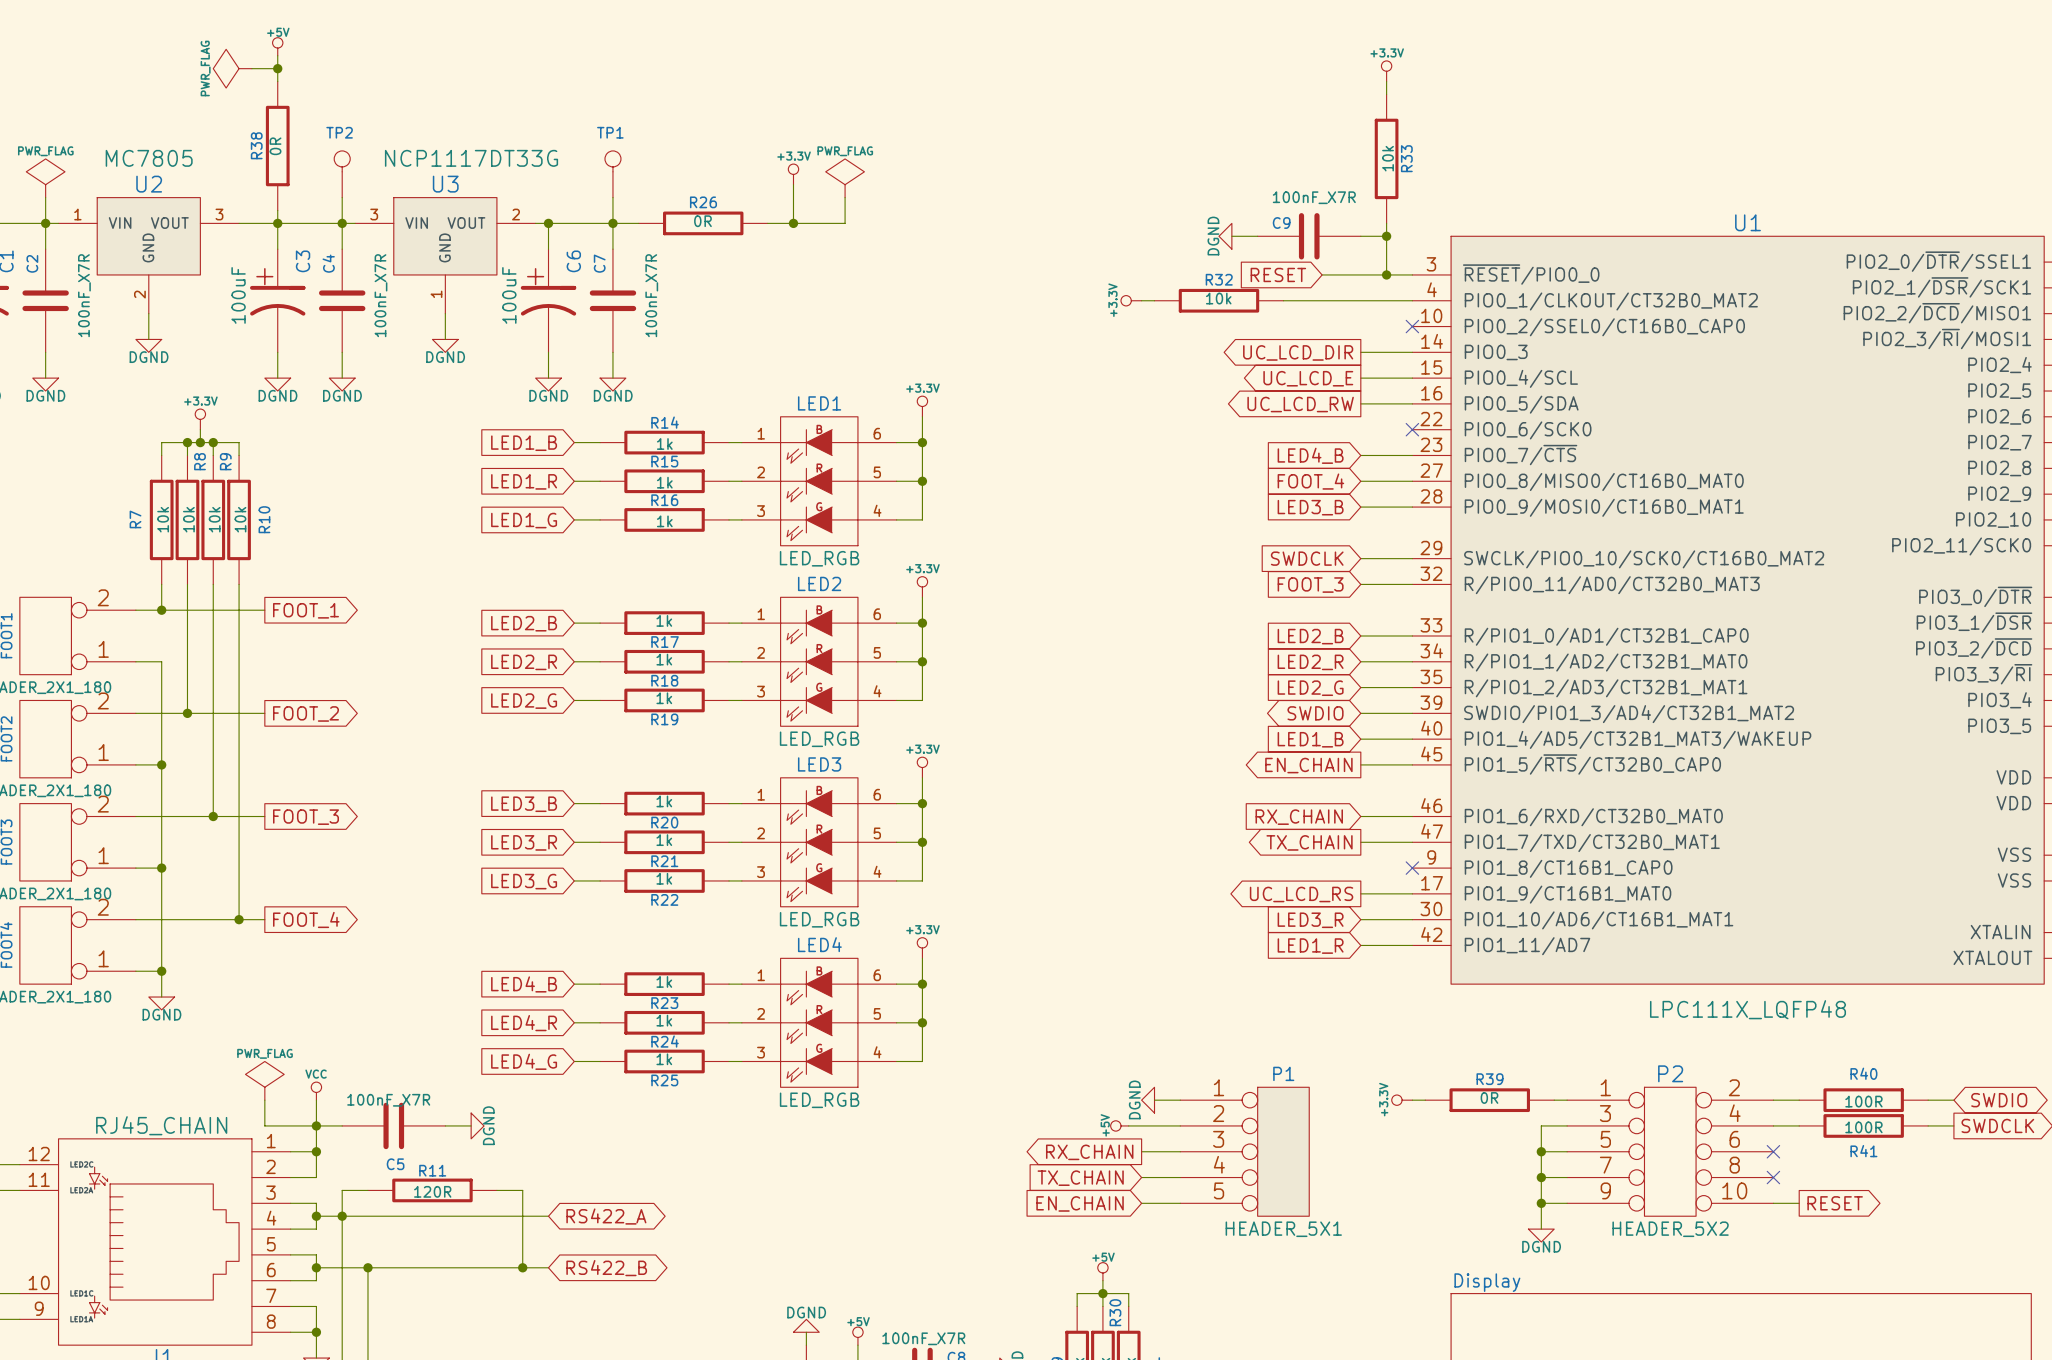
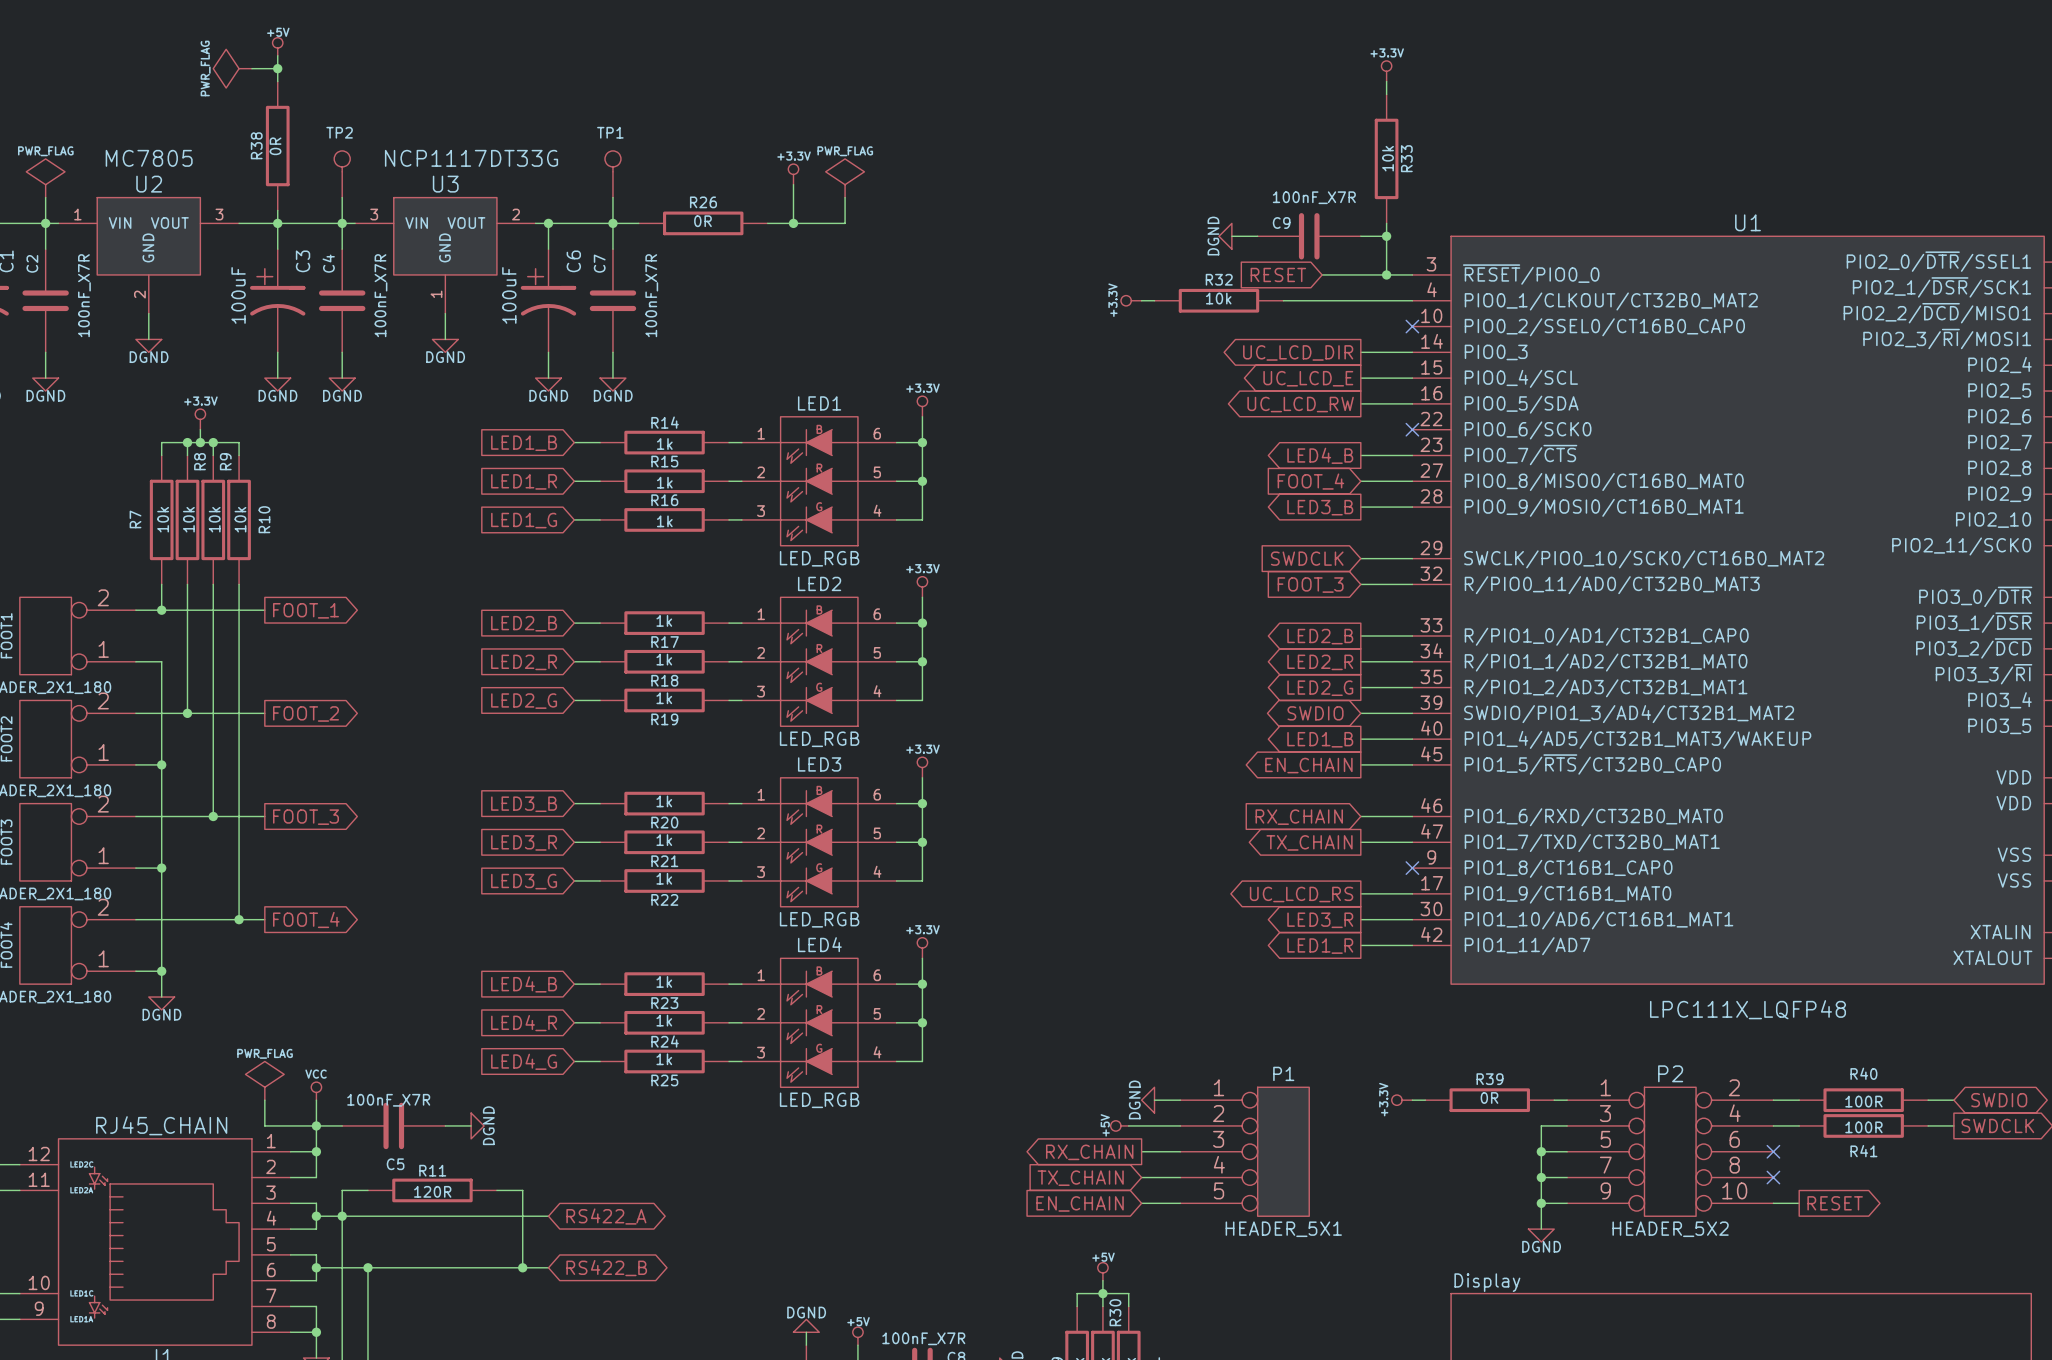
global label shape: input (1310, 455) -> output (1320, 455)
global label shape: input (1310, 507) -> output (1320, 507)
global label shape: input (1310, 636) -> output (1320, 636)
global label shape: input (1310, 662) -> output (1320, 662)
global label shape: input (1310, 688) -> output (1320, 688)
global label shape: input (1310, 739) -> output (1320, 739)
global label shape: input (1310, 920) -> output (1320, 920)
global label shape: input (1310, 946) -> output (1320, 946)

